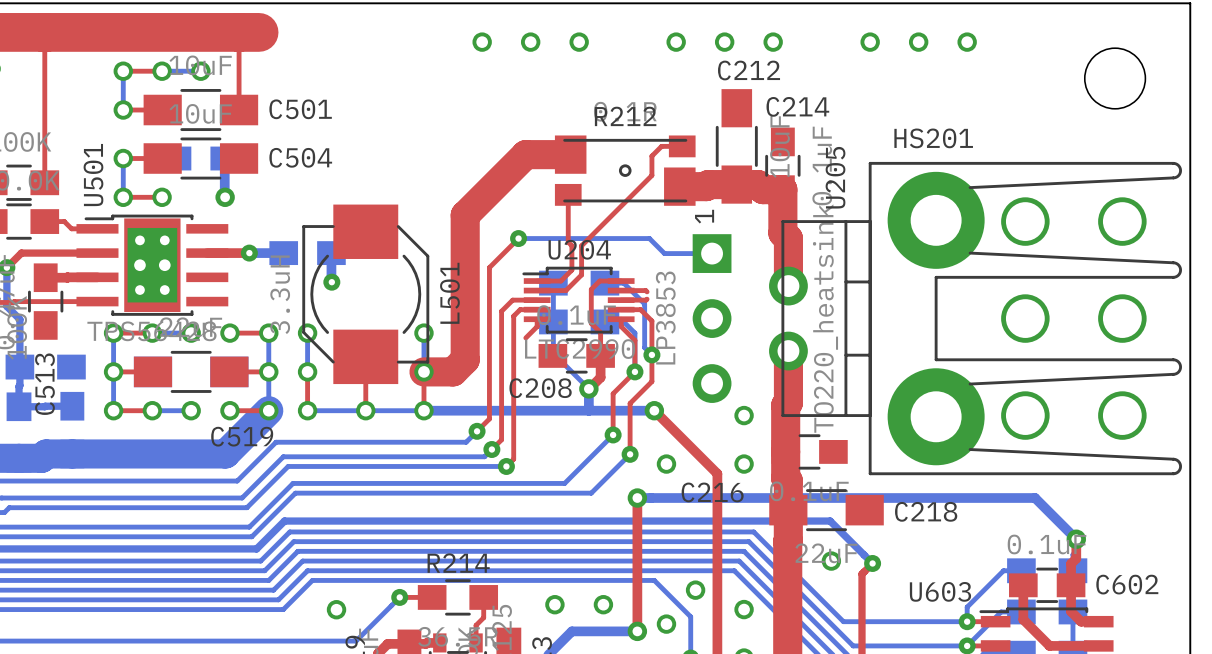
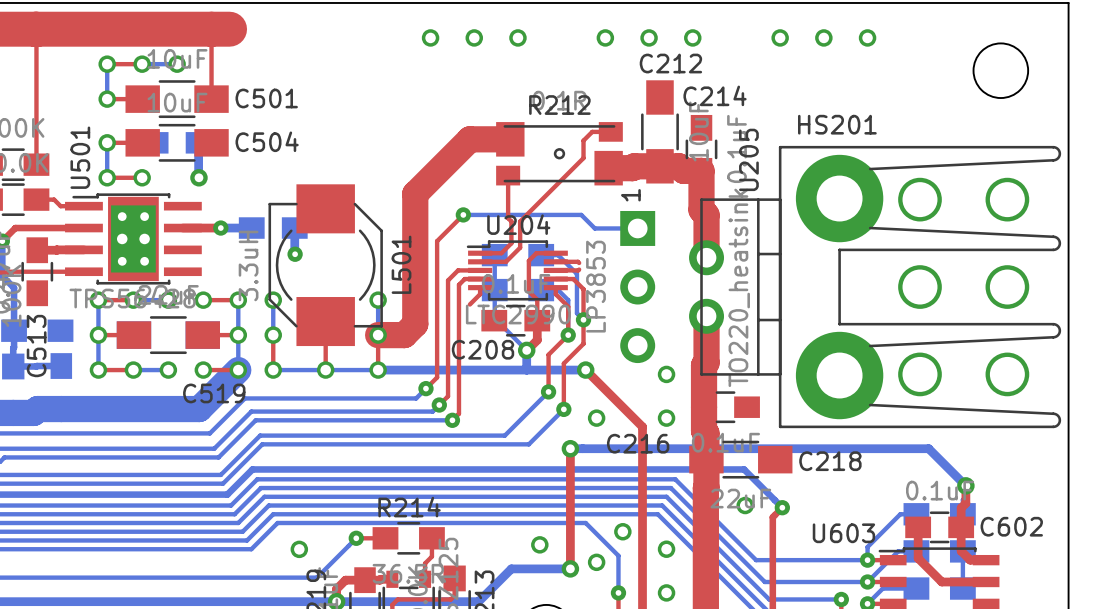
part: (554, 604) -> none

